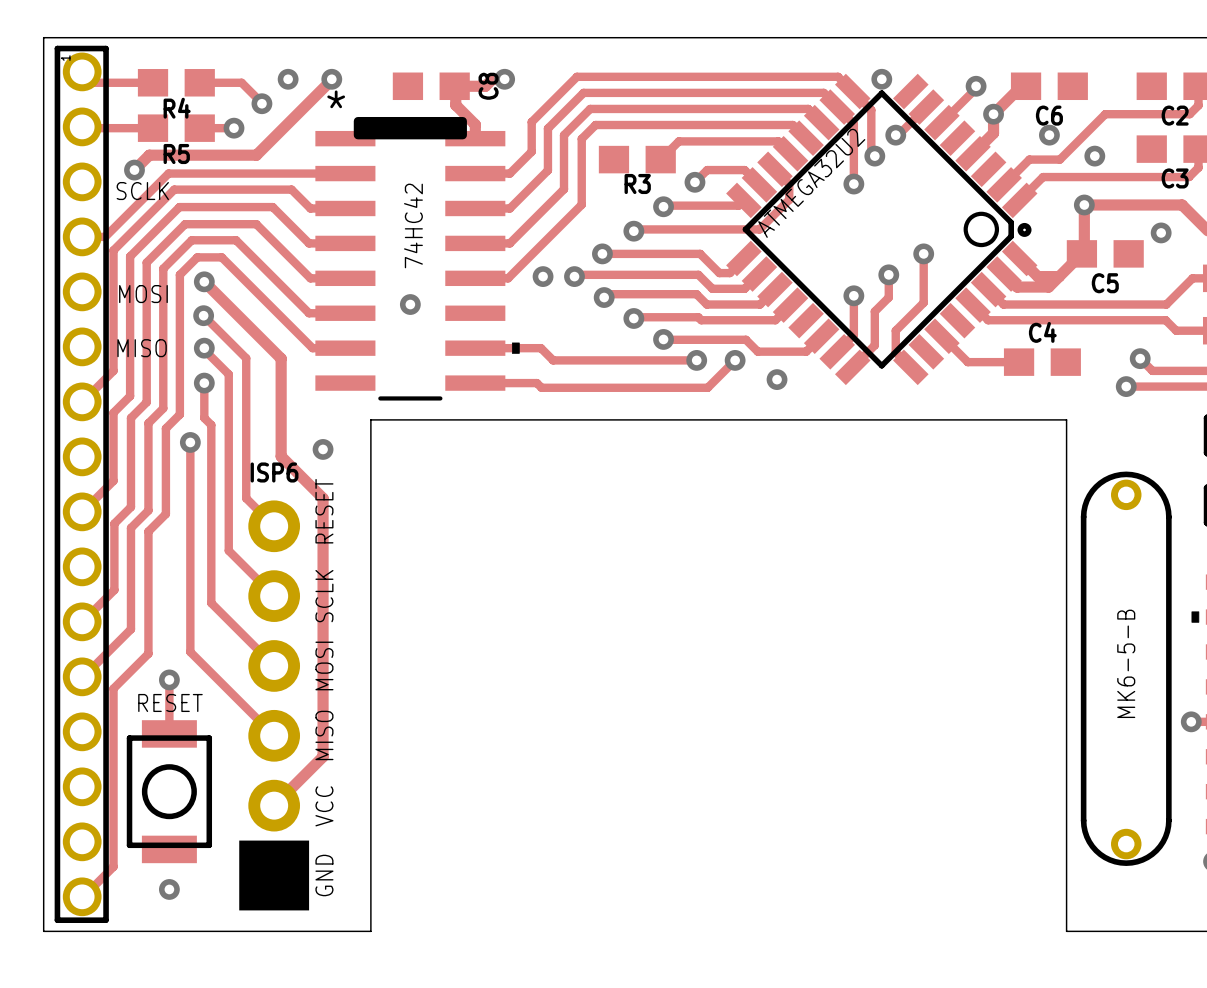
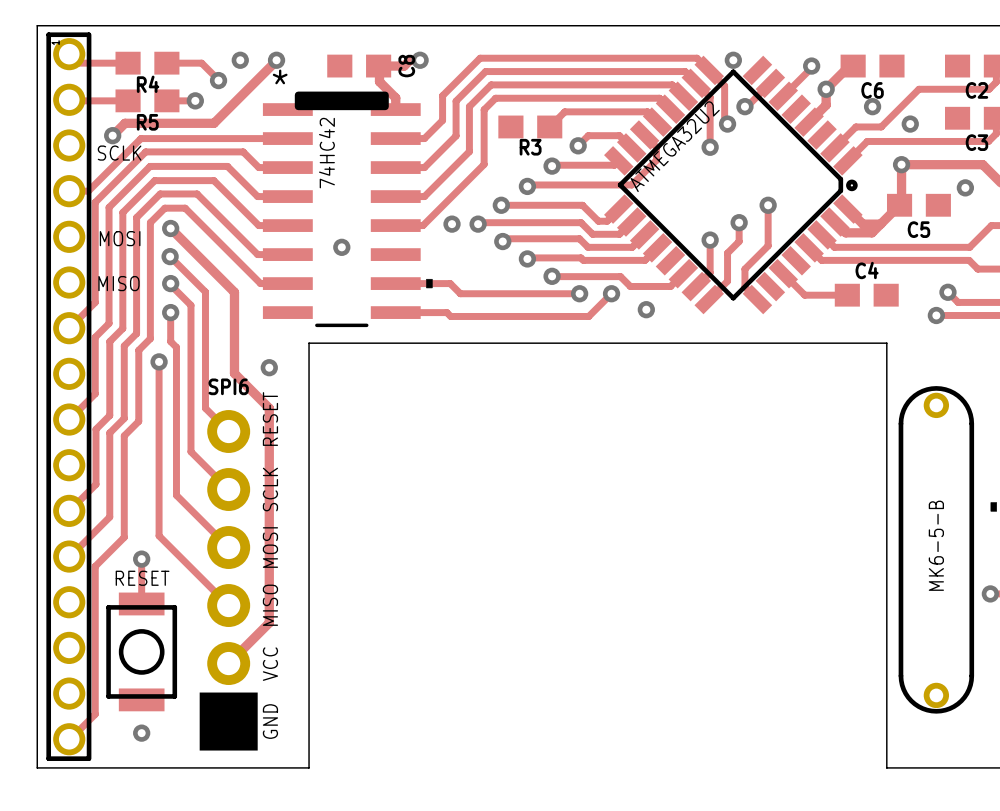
drawing: [963, 211, 1000, 248] -> none
text position: 74HC42 (413, 225) -> 74HC42 (326, 153)
ISP6 name: ISP6 (274, 472) -> SPI6 (228, 386)

